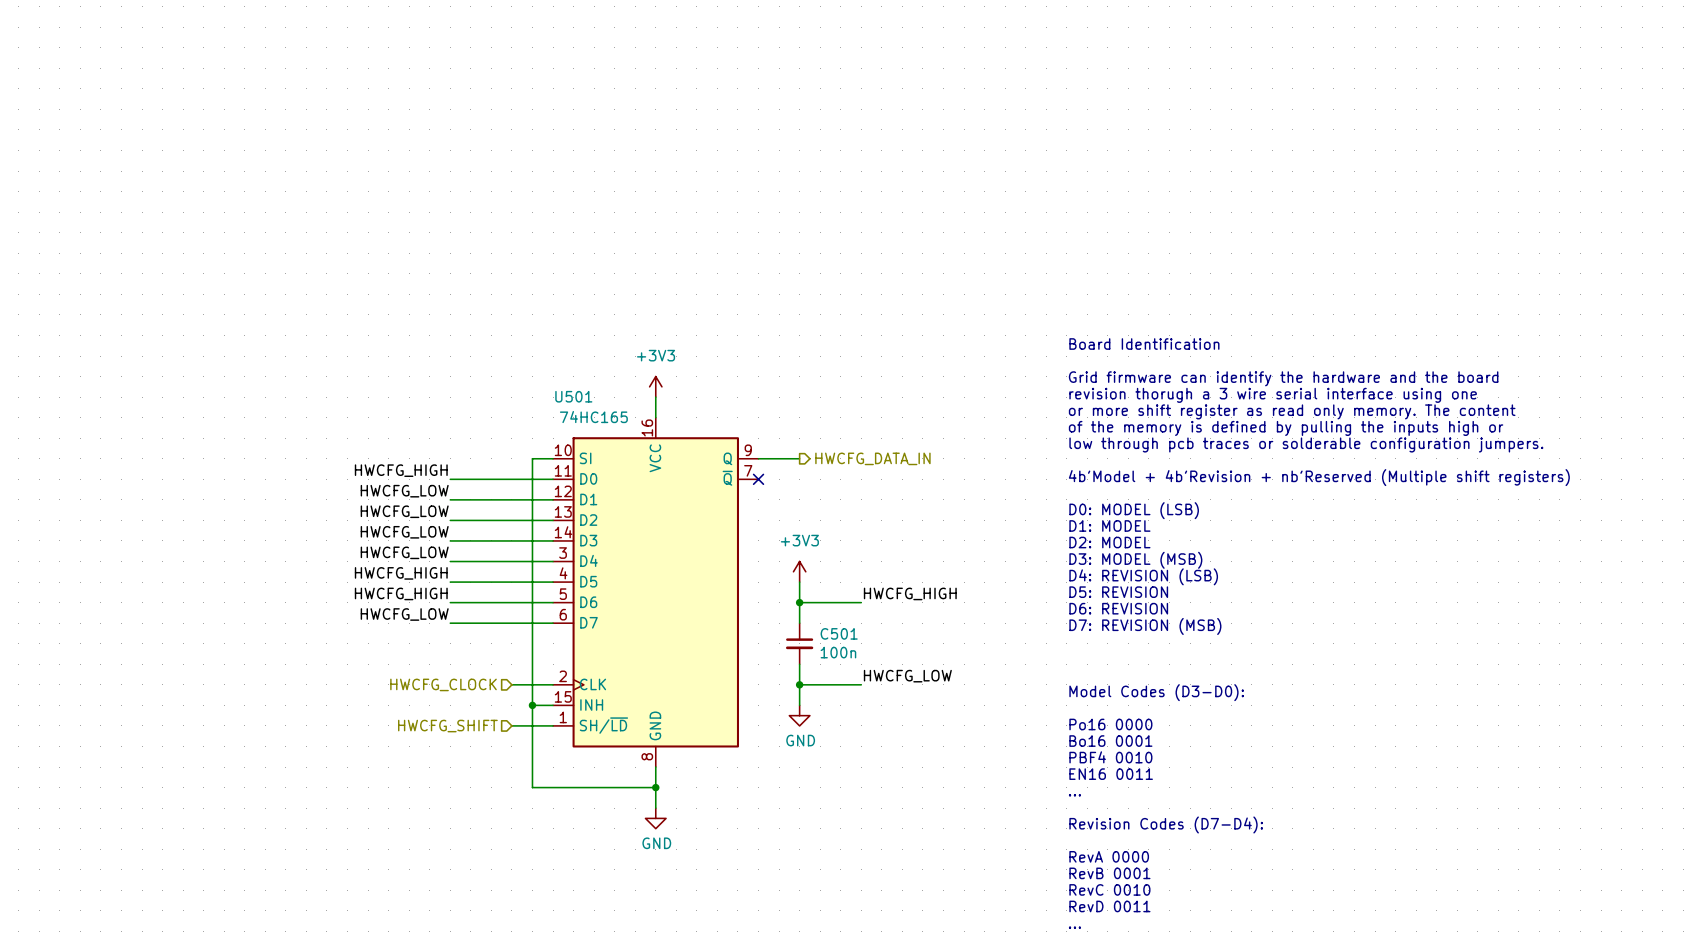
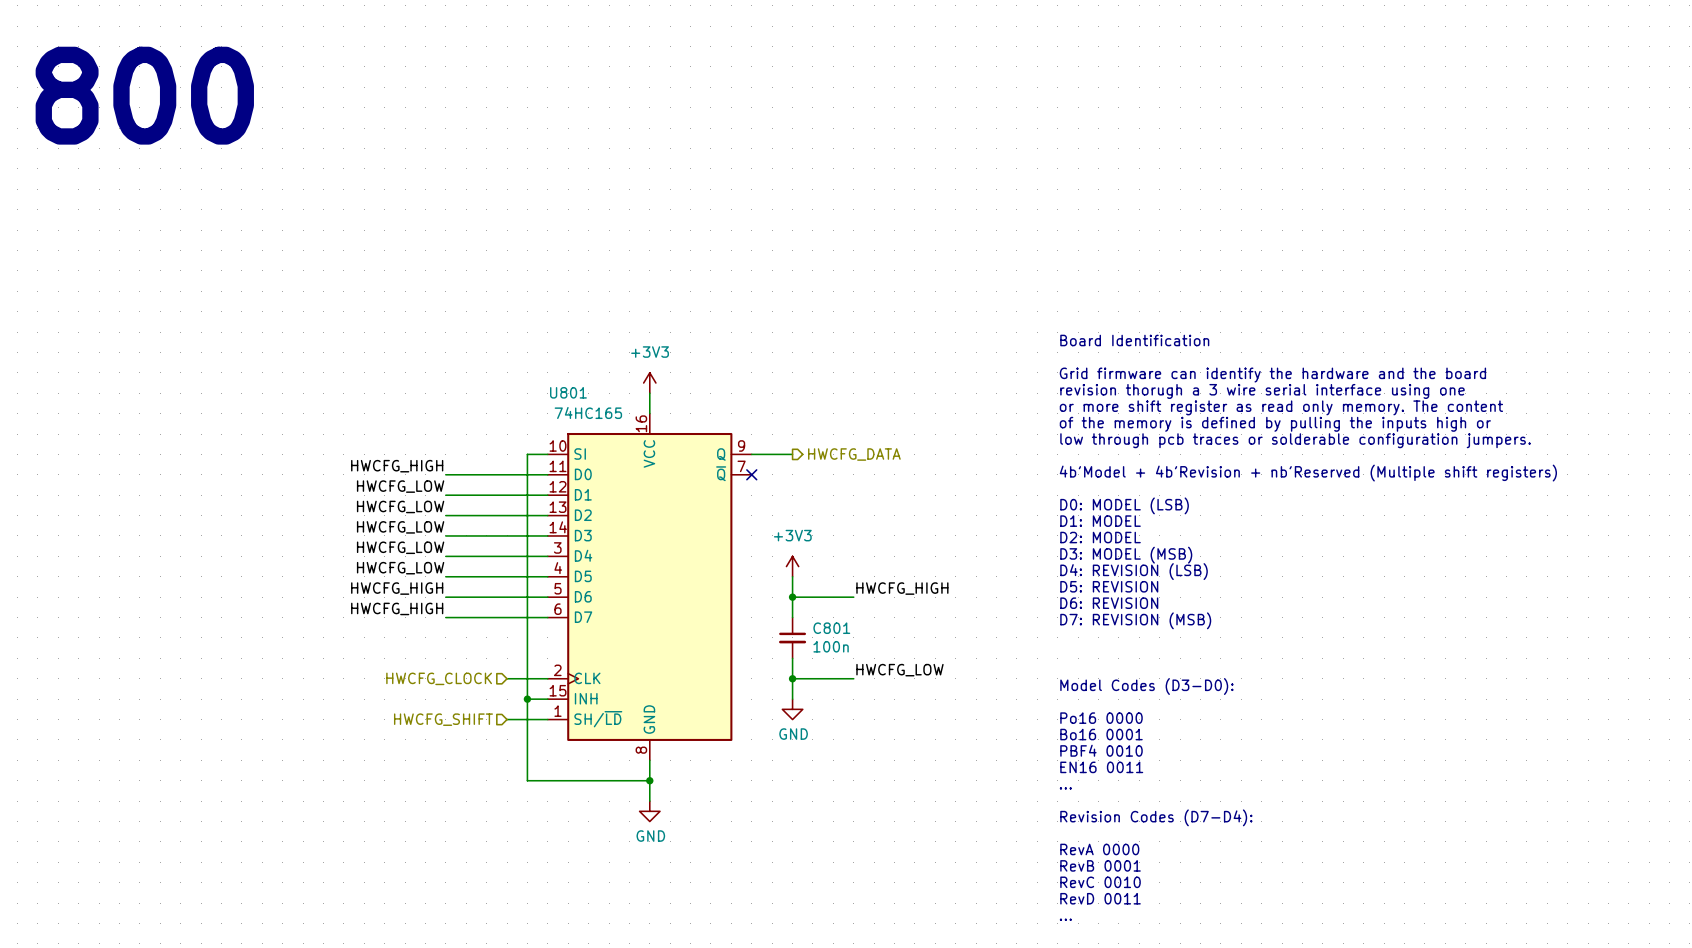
text: none -> 800 (144, 95)
U501 name: U501 (573, 396) -> U801 (568, 392)
hierarchical label: HWCFG_DATA_IN (872, 458) -> HWCFG_DATA (854, 454)
label: HWCFG_HIGH (401, 573) -> HWCFG_LOW (400, 568)
label: HWCFG_LOW (404, 614) -> HWCFG_HIGH (397, 608)
C501 name: C501 (839, 633) -> C801 (831, 628)

